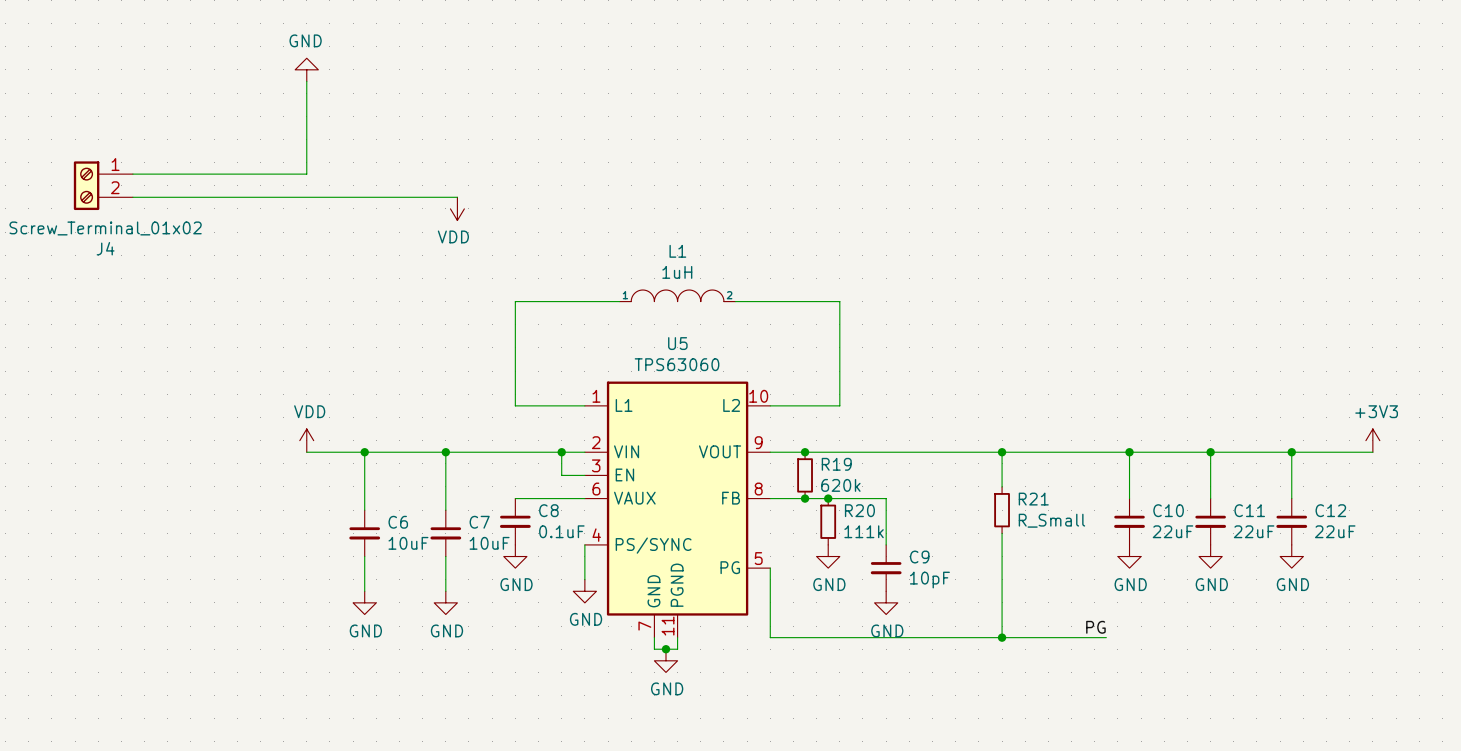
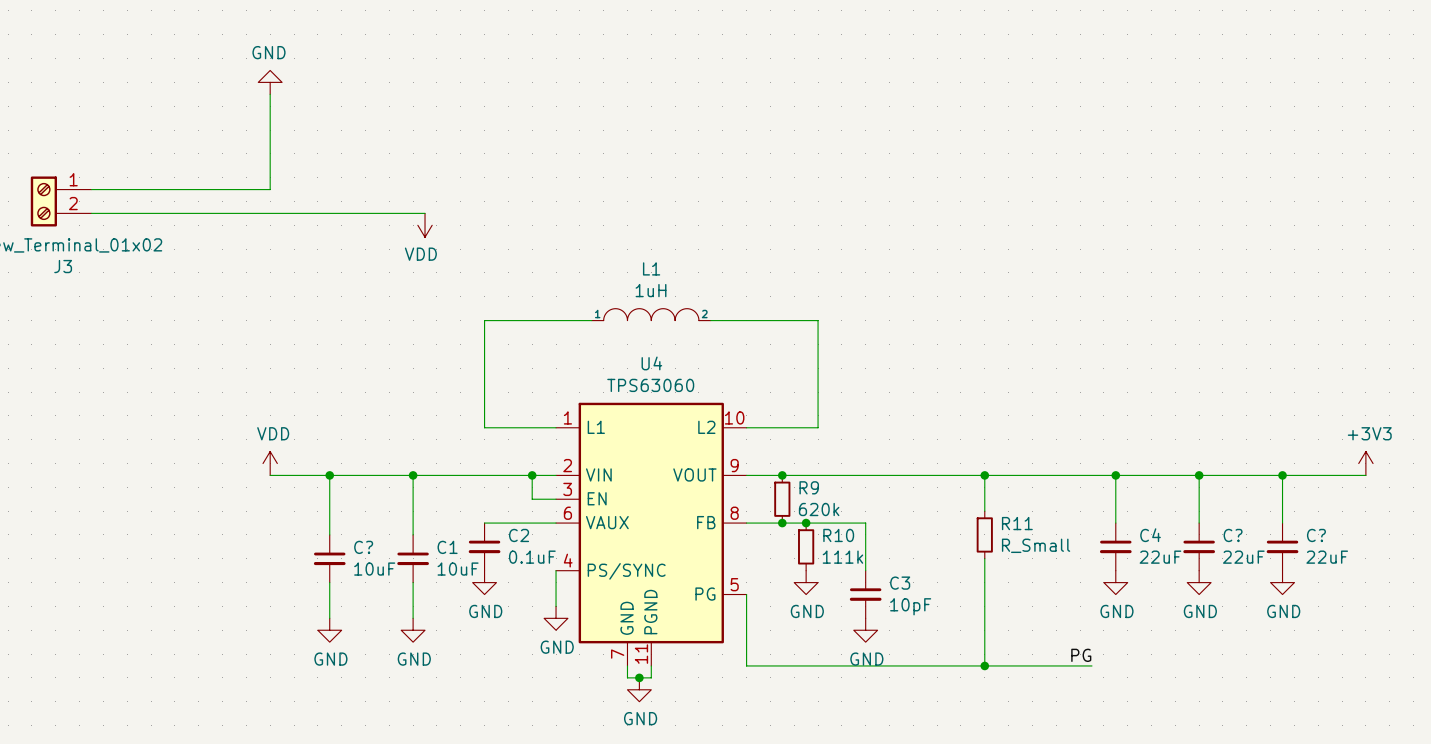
J4 name: J4 (105, 248) -> J3 (63, 266)
U5 name: U5 (677, 343) -> U4 (651, 363)
R19 name: R19 (836, 464) -> R9 (809, 487)
R21 name: R21 (1033, 499) -> R11 (1017, 523)
C8 name: C8 (548, 510) -> C2 (519, 535)
R20 name: R20 (859, 510) -> R10 (838, 535)
C10 name: C10 (1168, 510) -> C4 (1150, 535)
C11 name: C11 (1249, 510) -> C? (1233, 535)
C12 name: C12 (1330, 510) -> C? (1316, 535)
C6 name: C6 (398, 522) -> C? (363, 547)
C7 name: C7 (479, 522) -> C1 (447, 547)
C9 name: C9 (919, 557) -> C3 (900, 583)

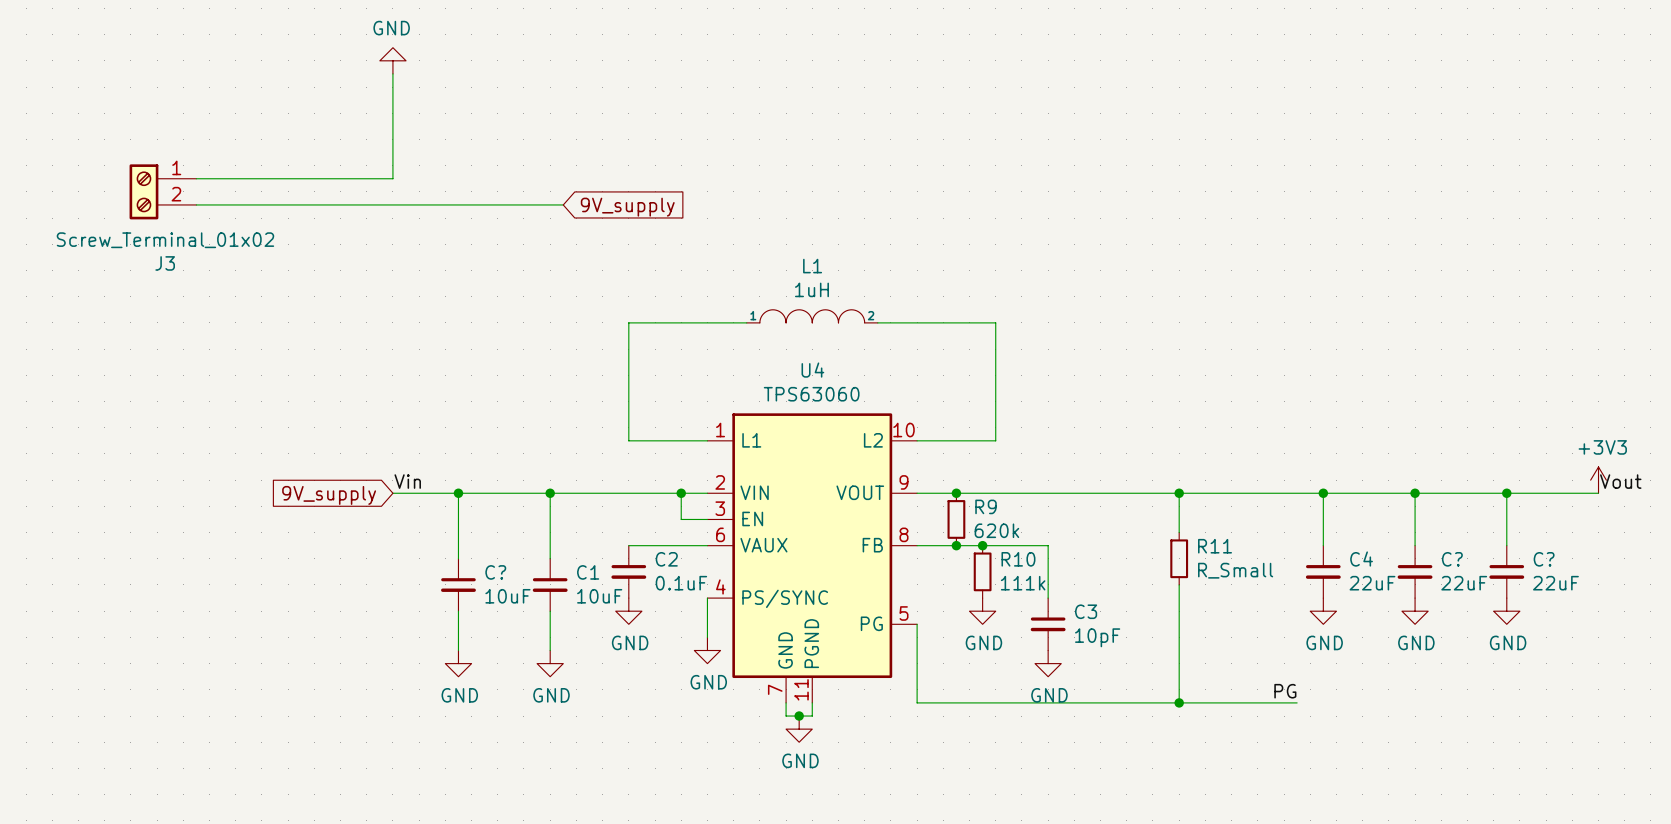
global label: none -> 9V_supply (627, 207)
power symbol: VDD (425, 225) -> none
power symbol: VDD (270, 463) -> none
label: none -> Vin (407, 481)
label: none -> Vout (1620, 481)
global label: none -> 9V_supply (329, 495)

